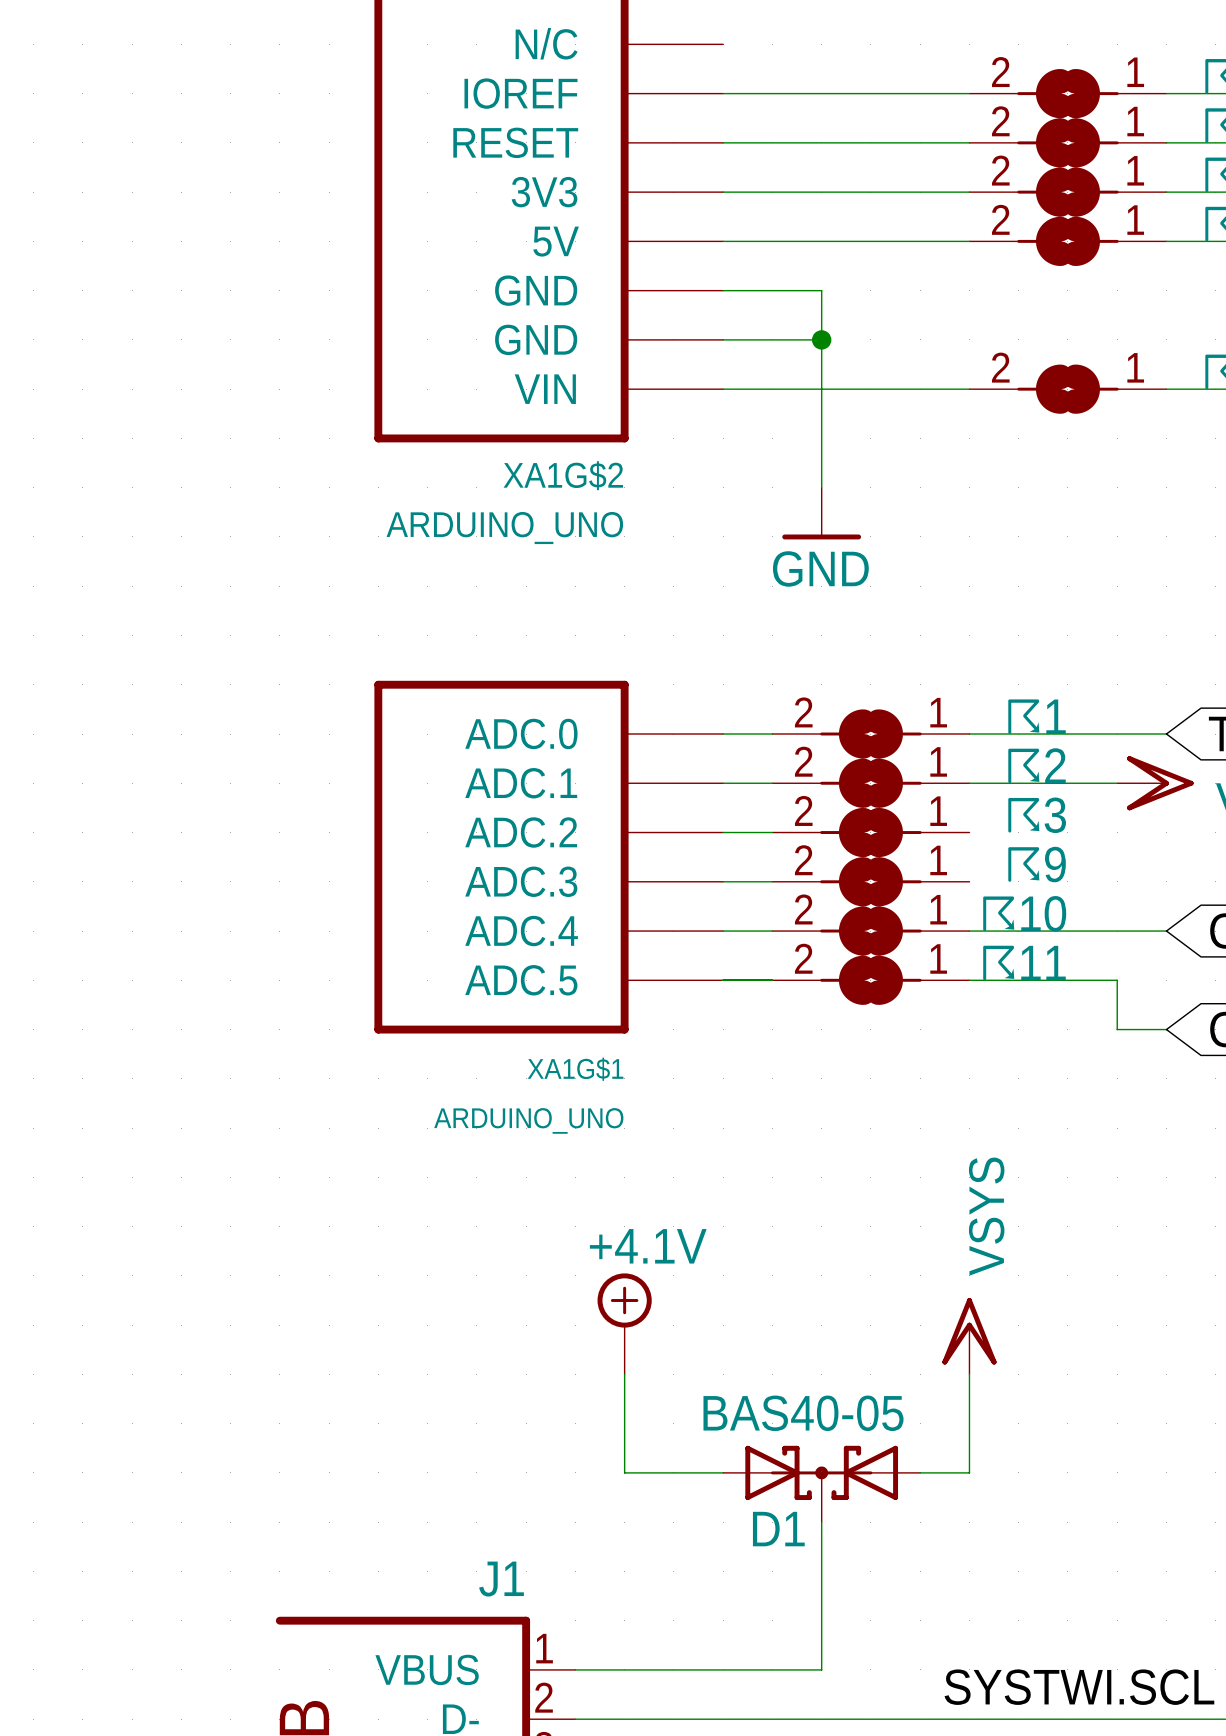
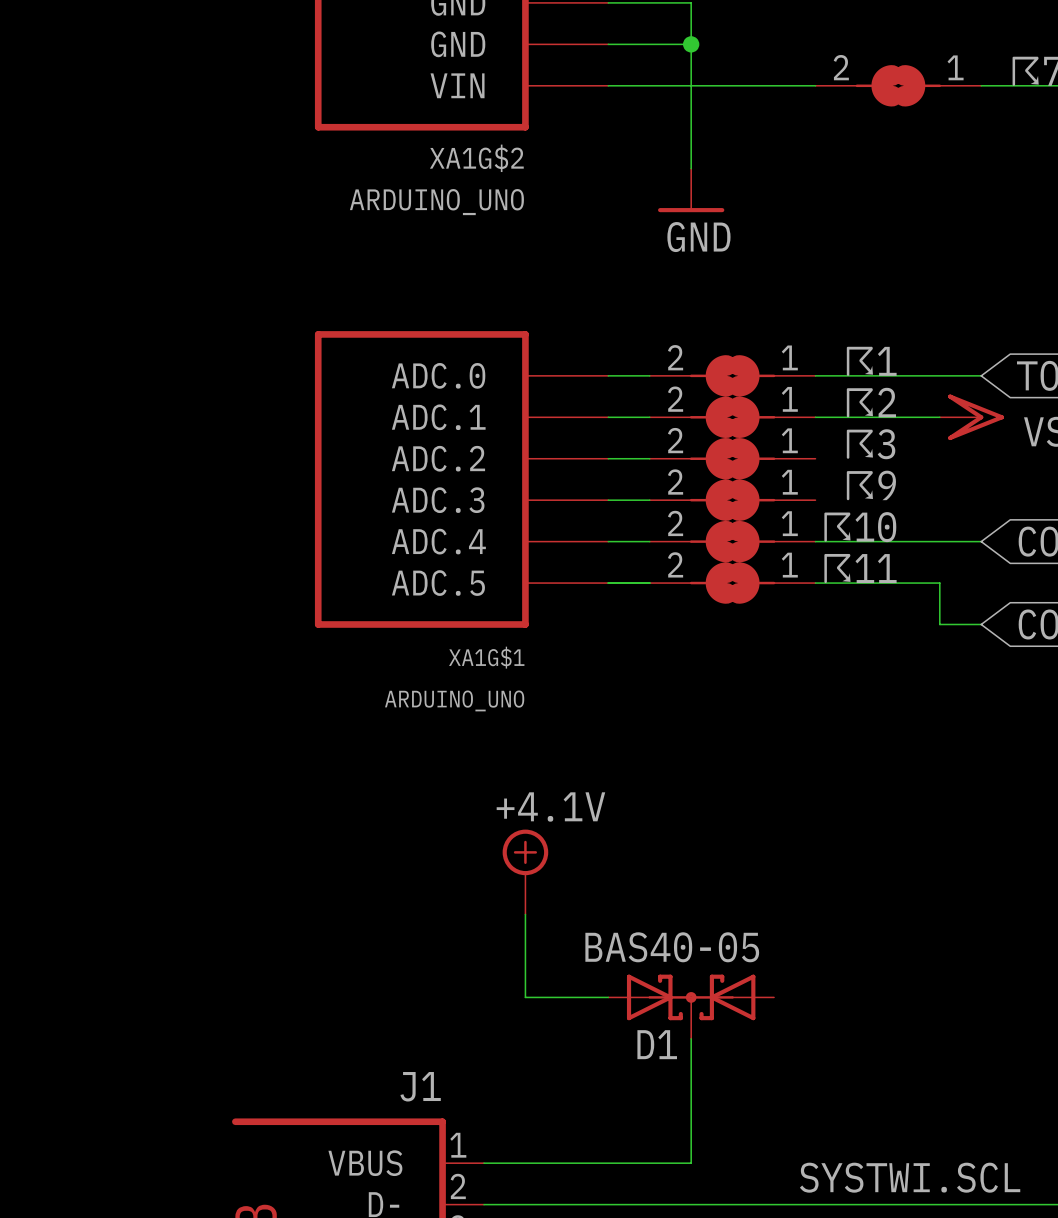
power symbol: VSYS (969, 1336) -> none
wire: (969, 1374) (969, 1472) (920, 1472) -> none

